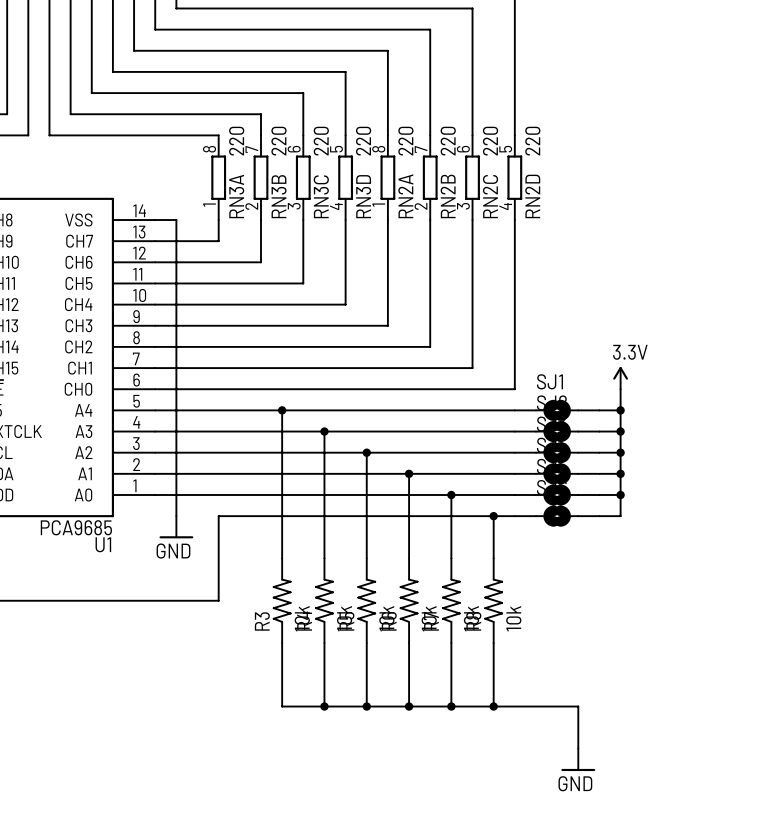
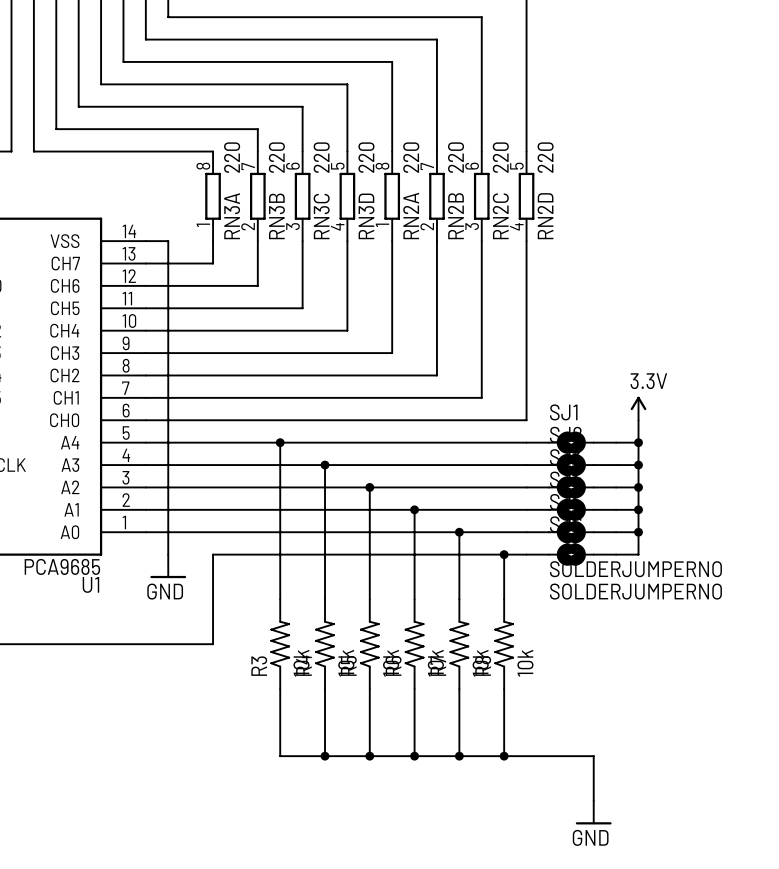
part value: none -> SOLDERJUMPERNO (635, 569)
part value: none -> SOLDERJUMPERNO (635, 591)

